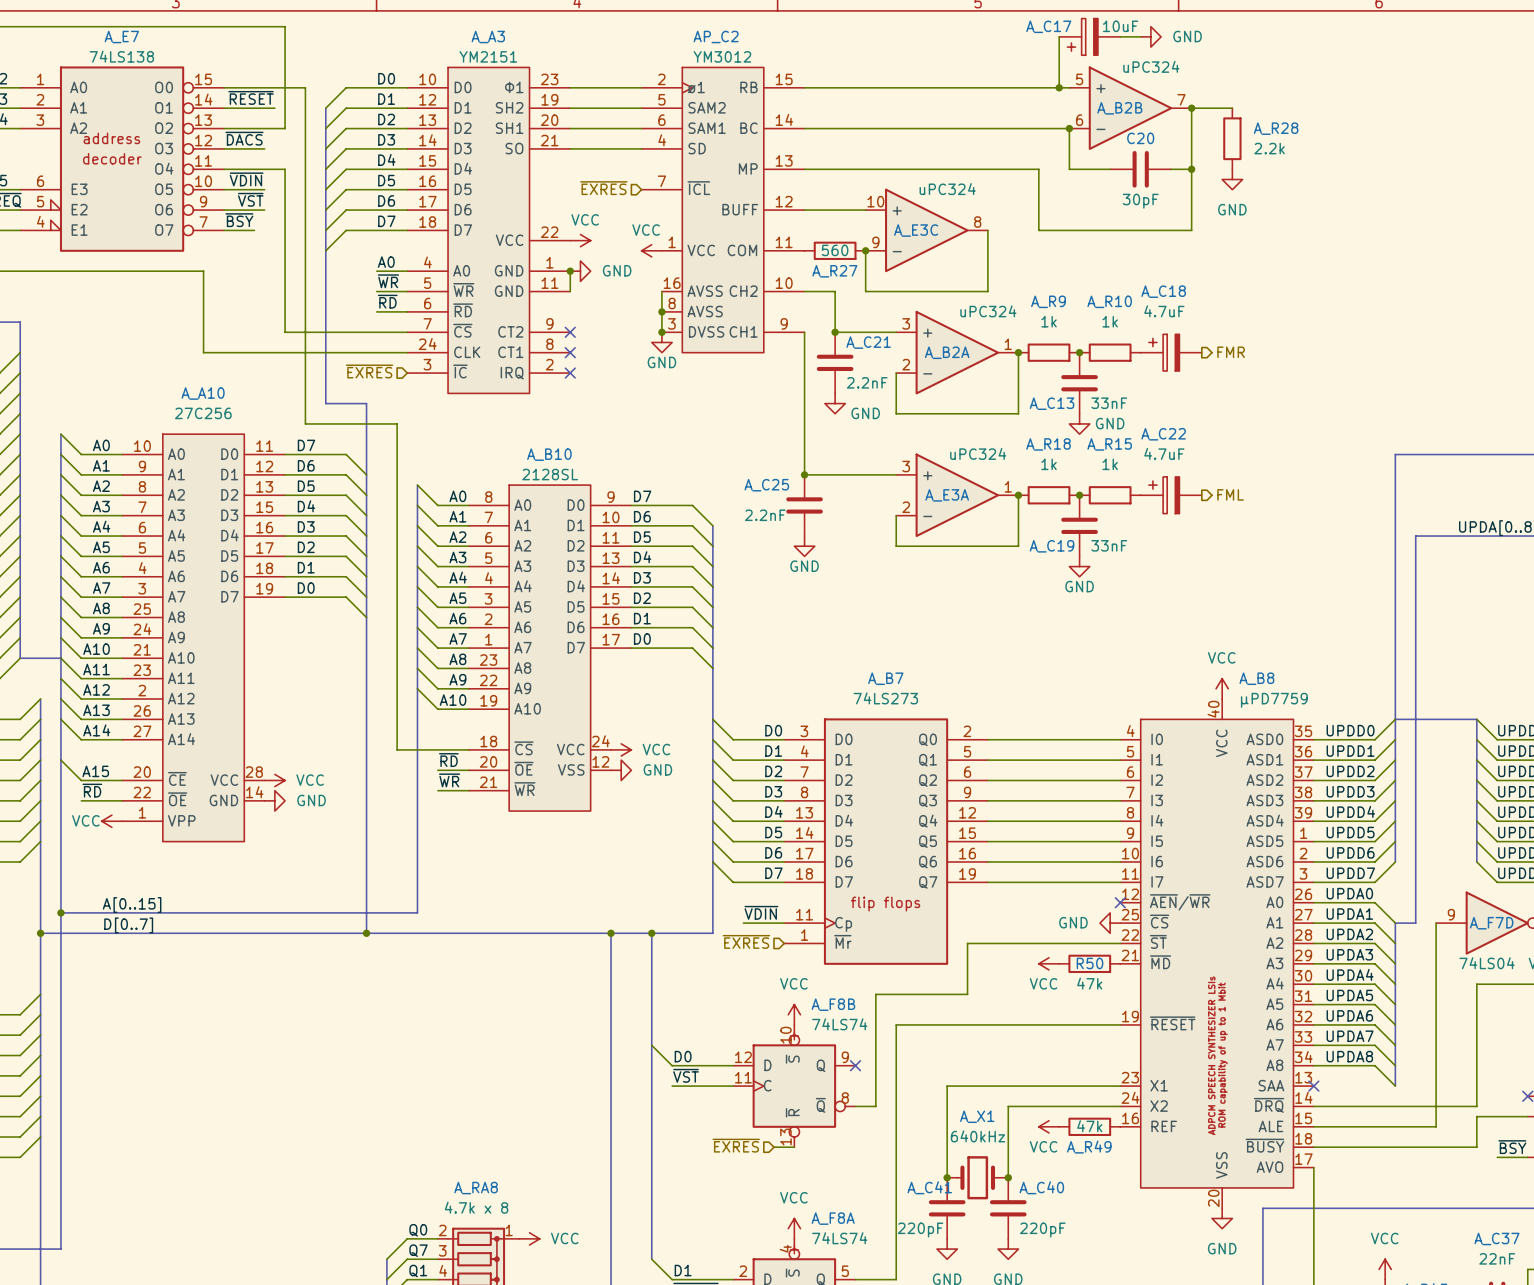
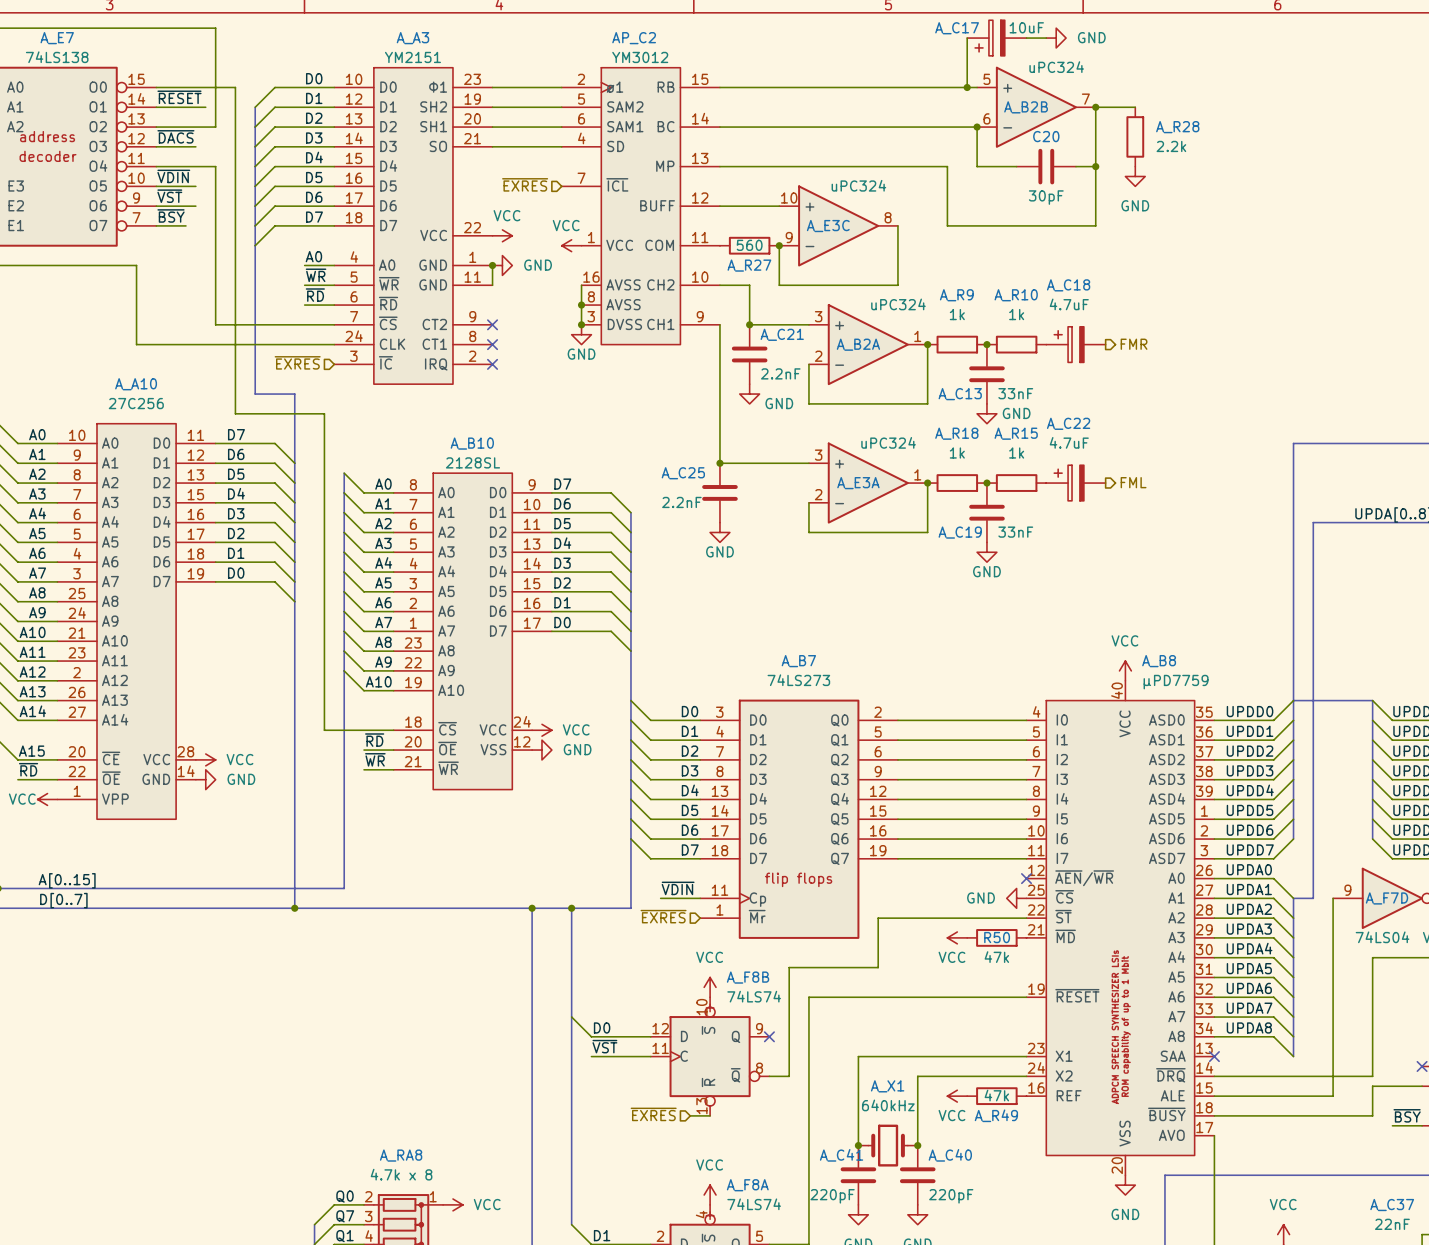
label position: ~{RESET} (251, 97) -> ~{RESET} (179, 97)
label position: ~{DACS} (244, 138) -> ~{DACS} (175, 136)
label position: ~{VDIN} (246, 179) -> ~{VDIN} (173, 176)
label position: ~{VST} (250, 199) -> ~{VST} (169, 196)
label position: ~{BSY} (239, 220) -> ~{BSY} (171, 215)

